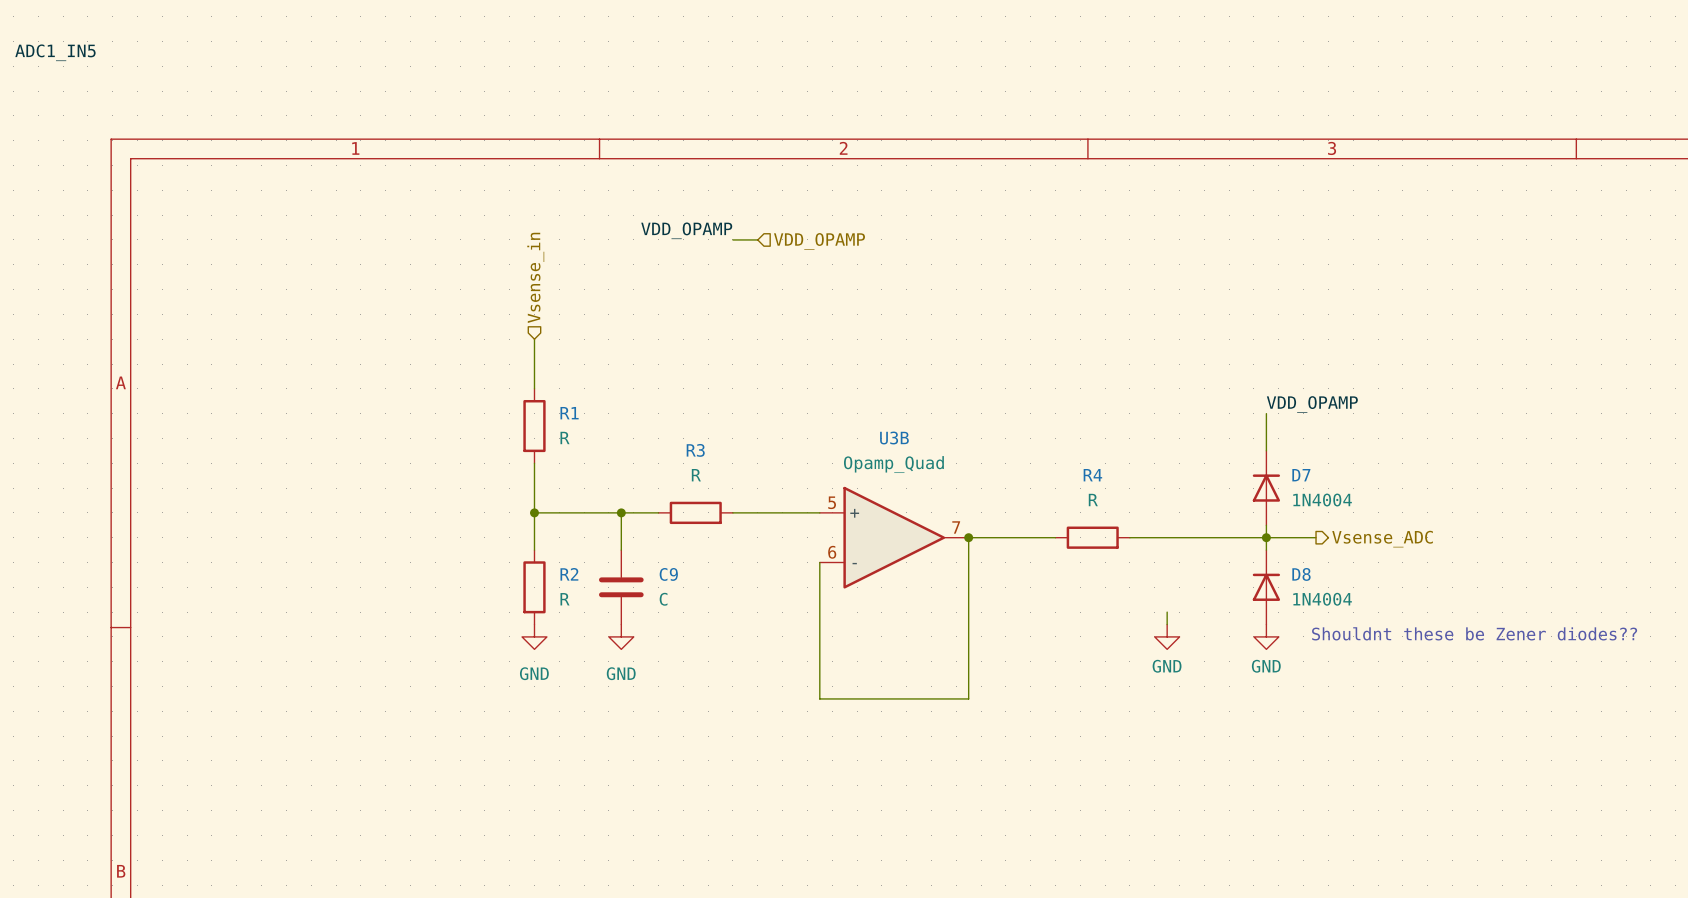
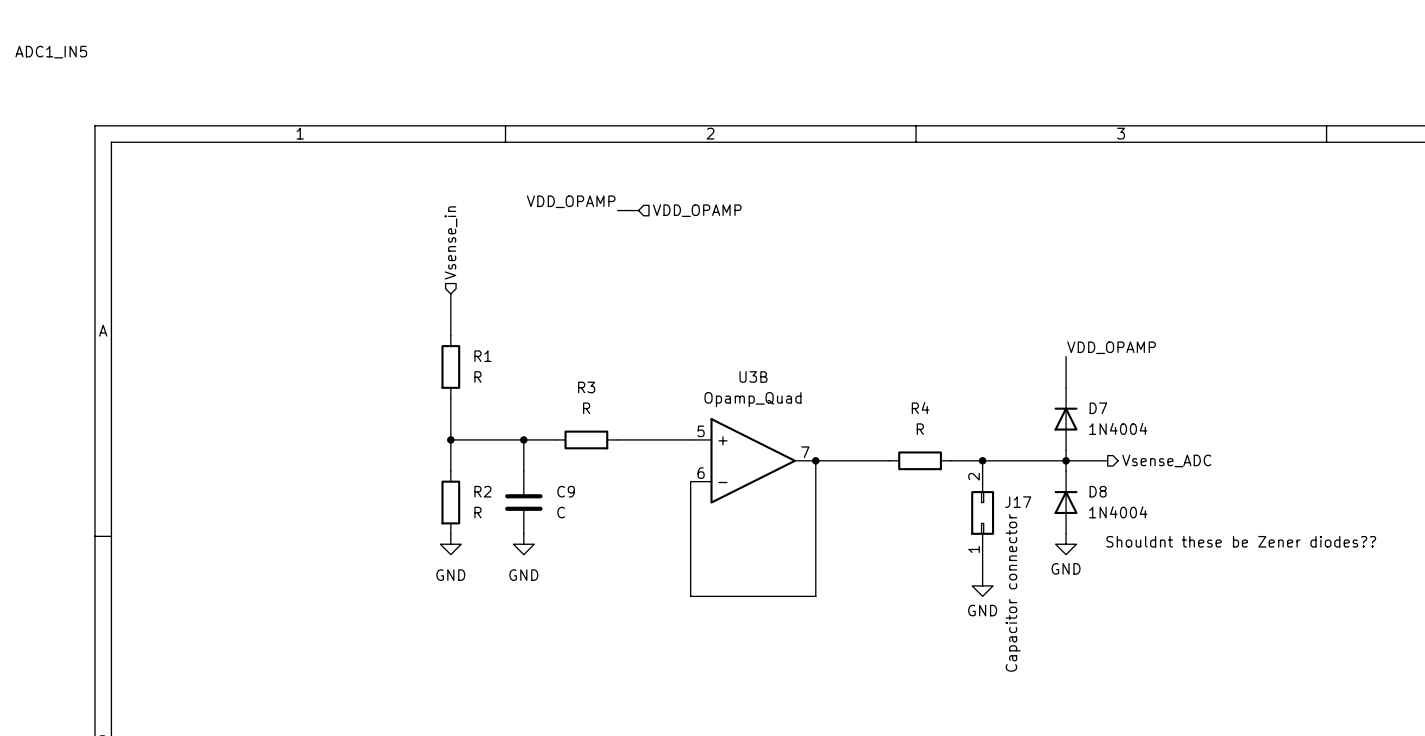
junction: none -> (982, 460)
J17: none -> Capacitor connector (982, 512)
power symbol position: GND (1167, 636) -> GND (982, 585)

